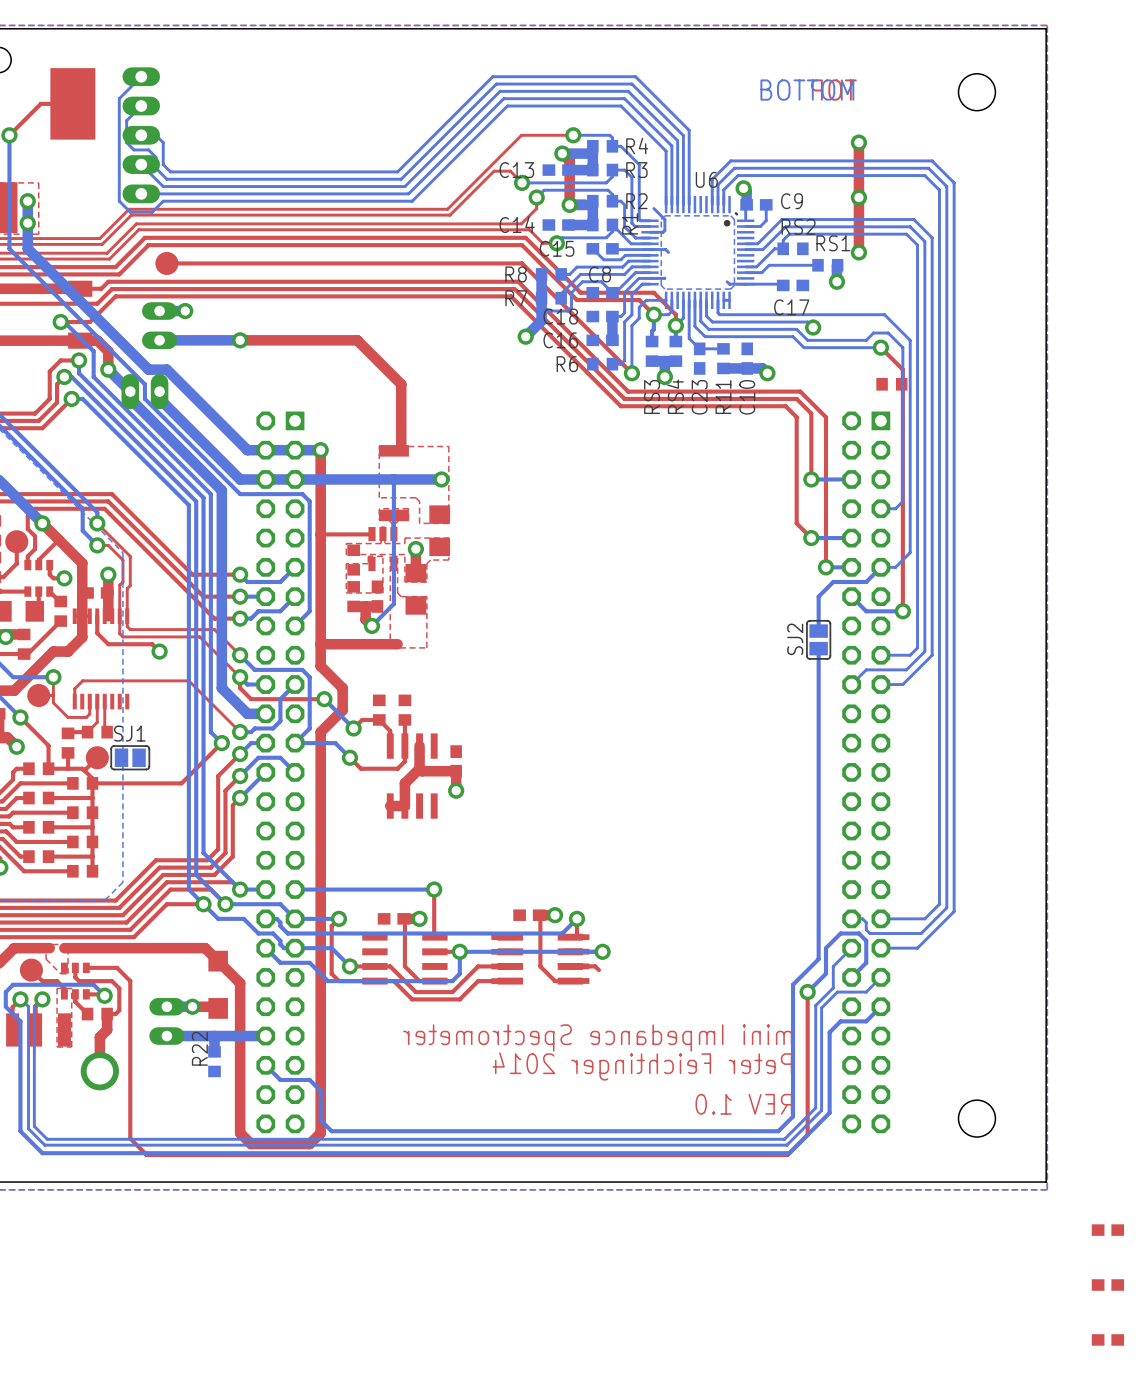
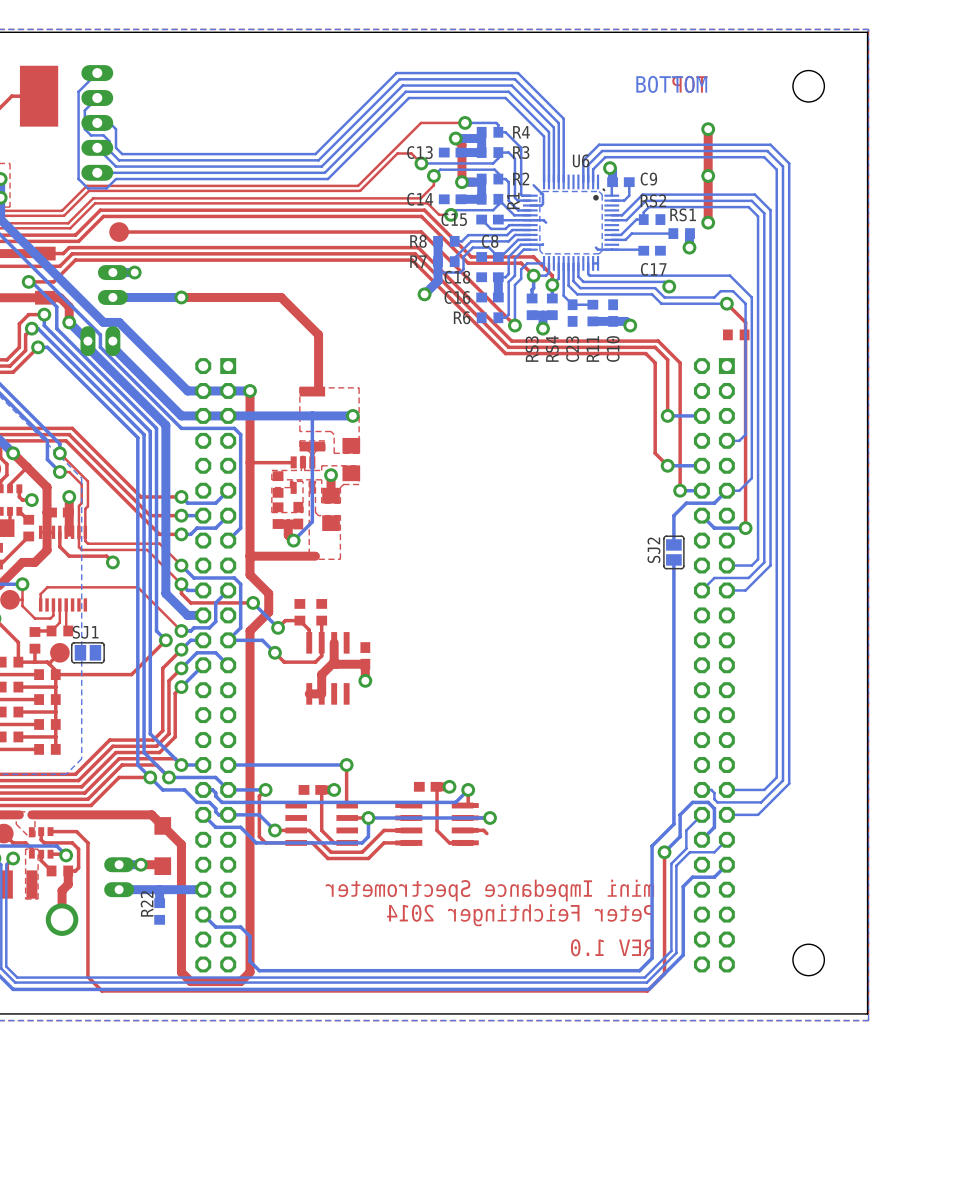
part: (1107, 1230) -> none
part: (1107, 1285) -> none
part: (1107, 1339) -> none

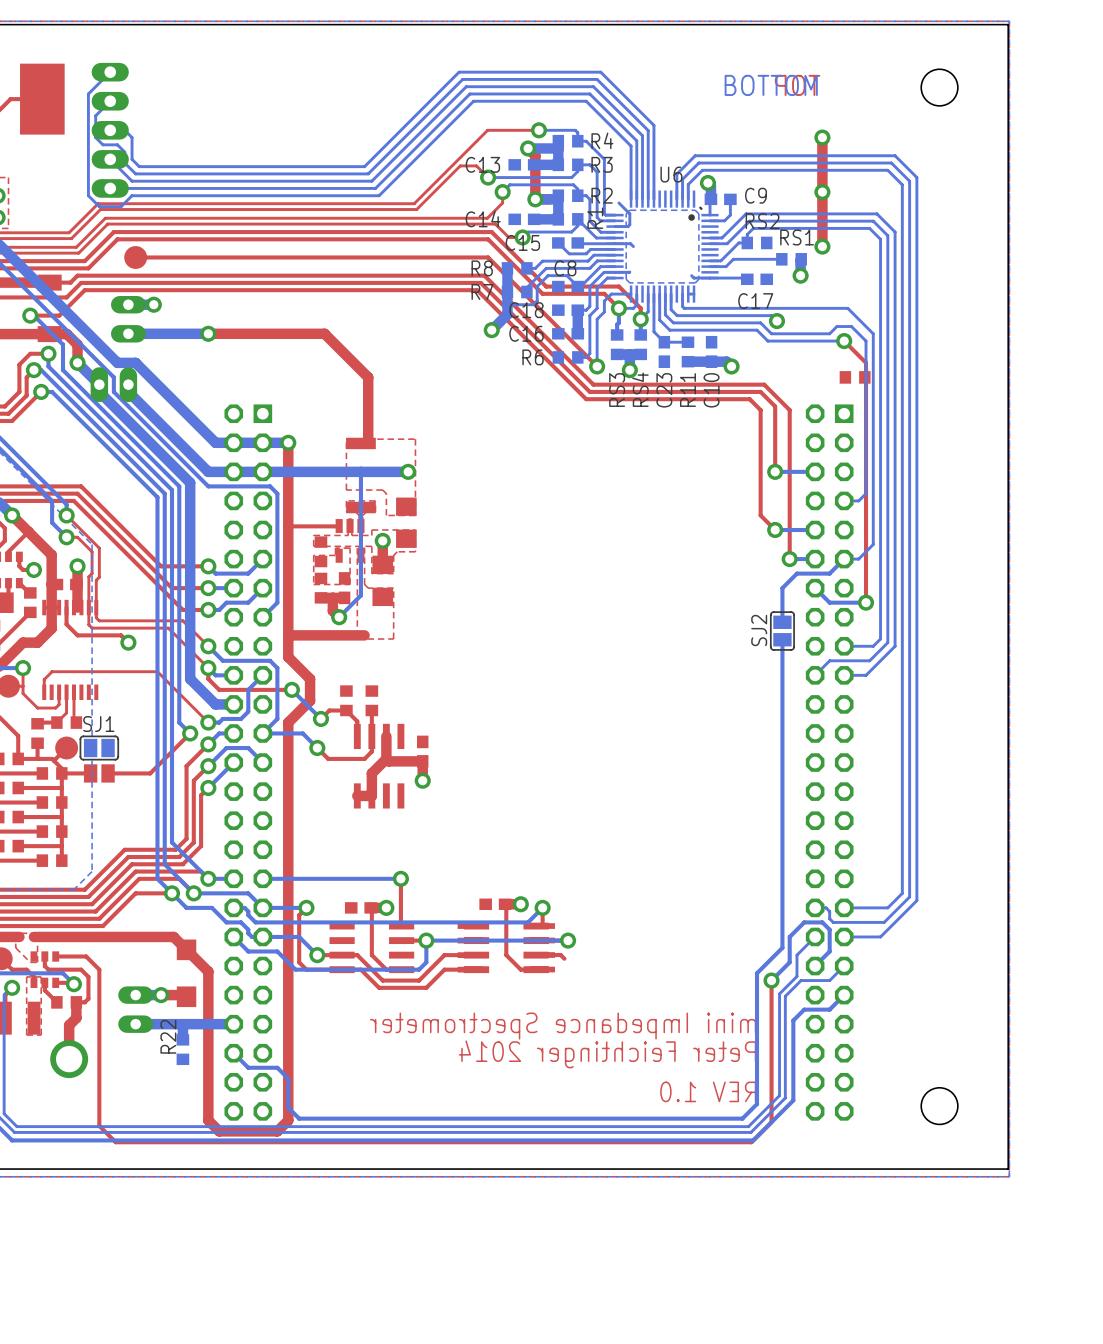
part: none -> (99, 773)
top track: (95, 674) (80, 674) -> none

